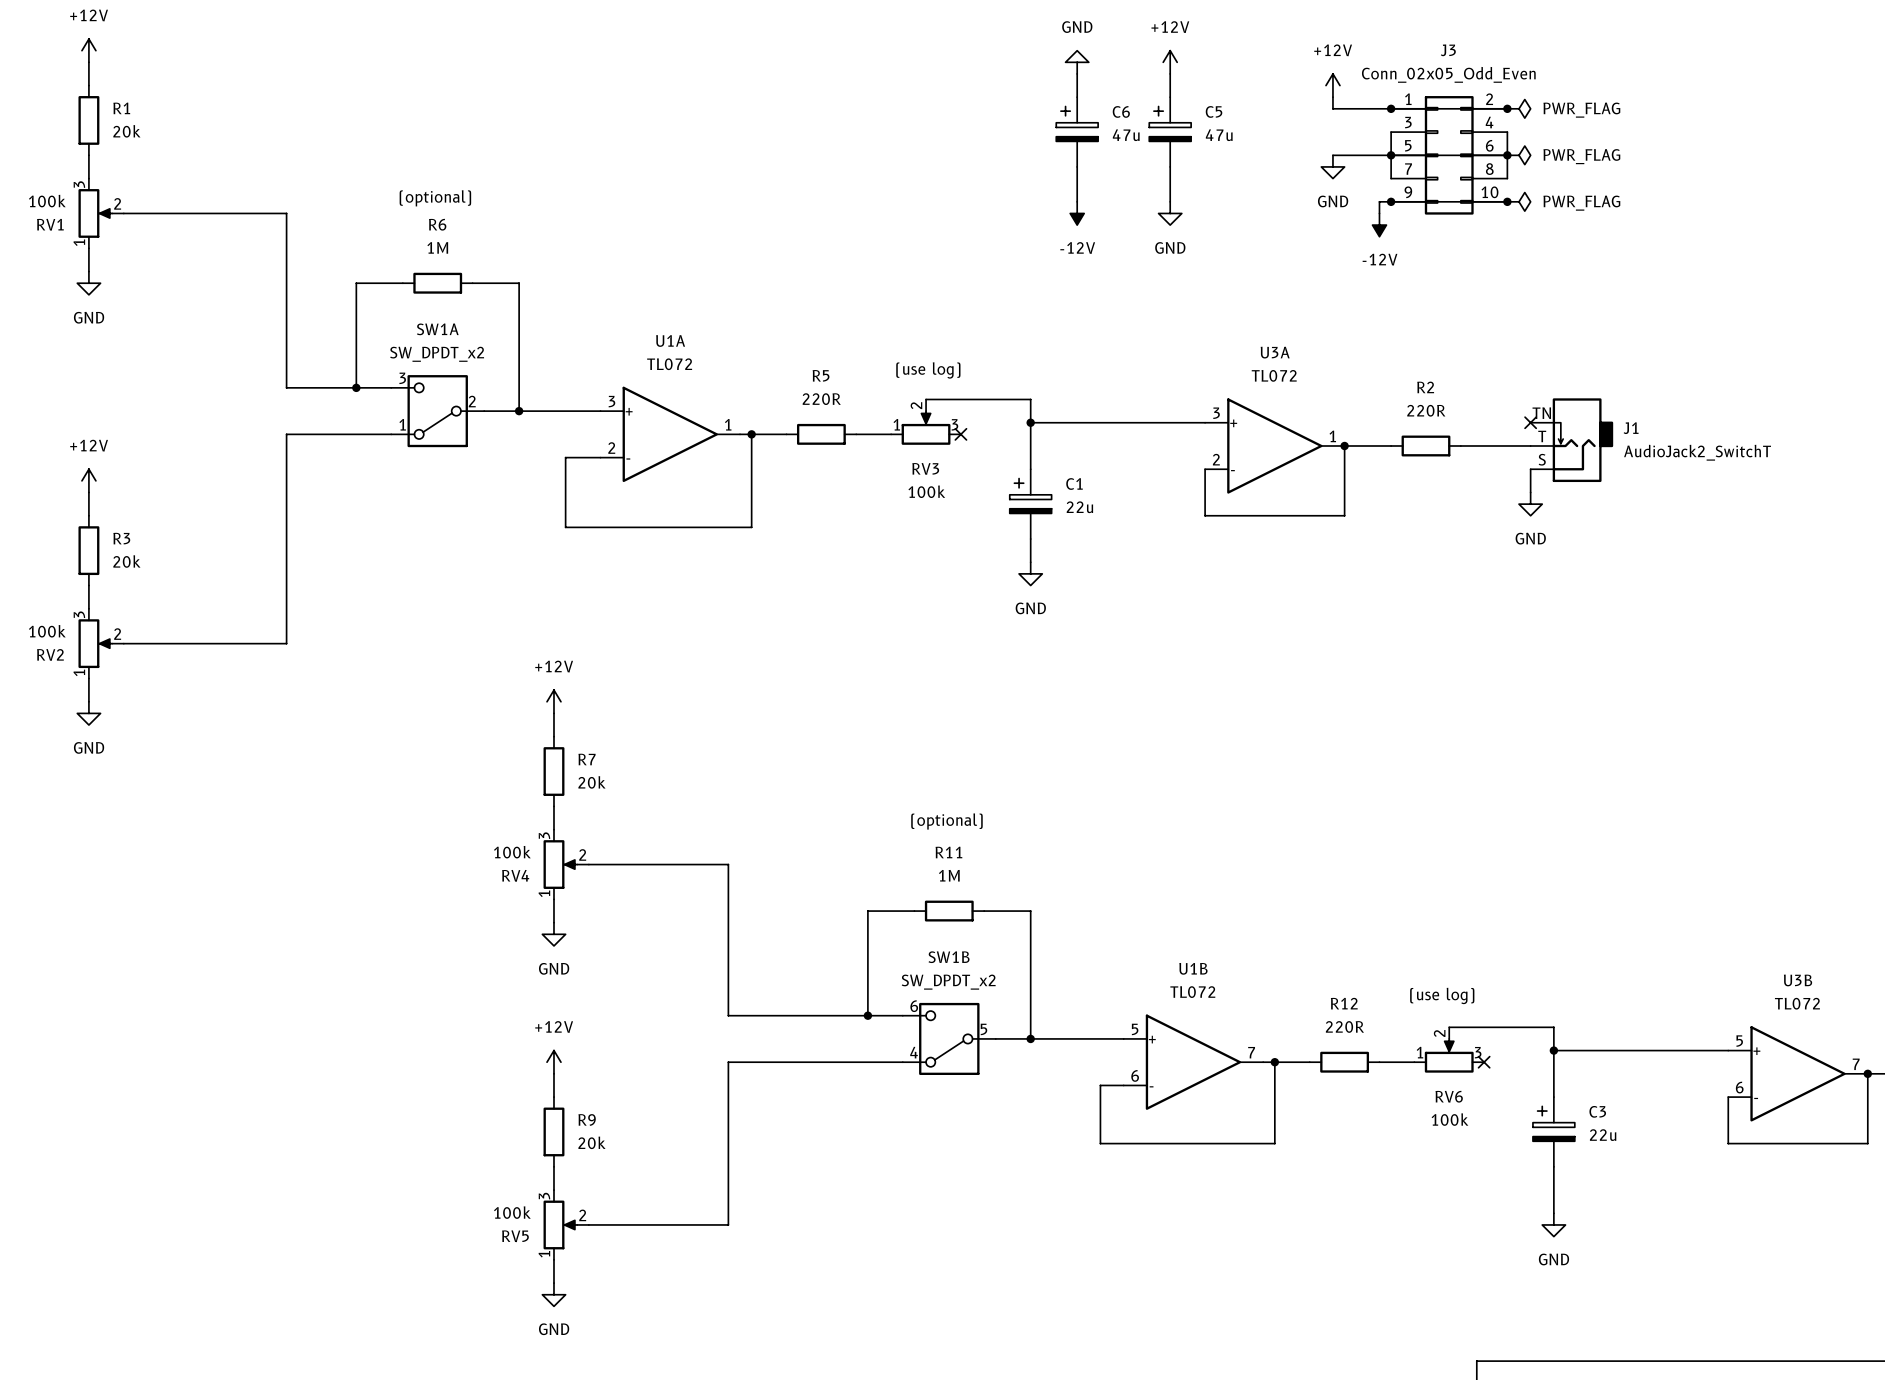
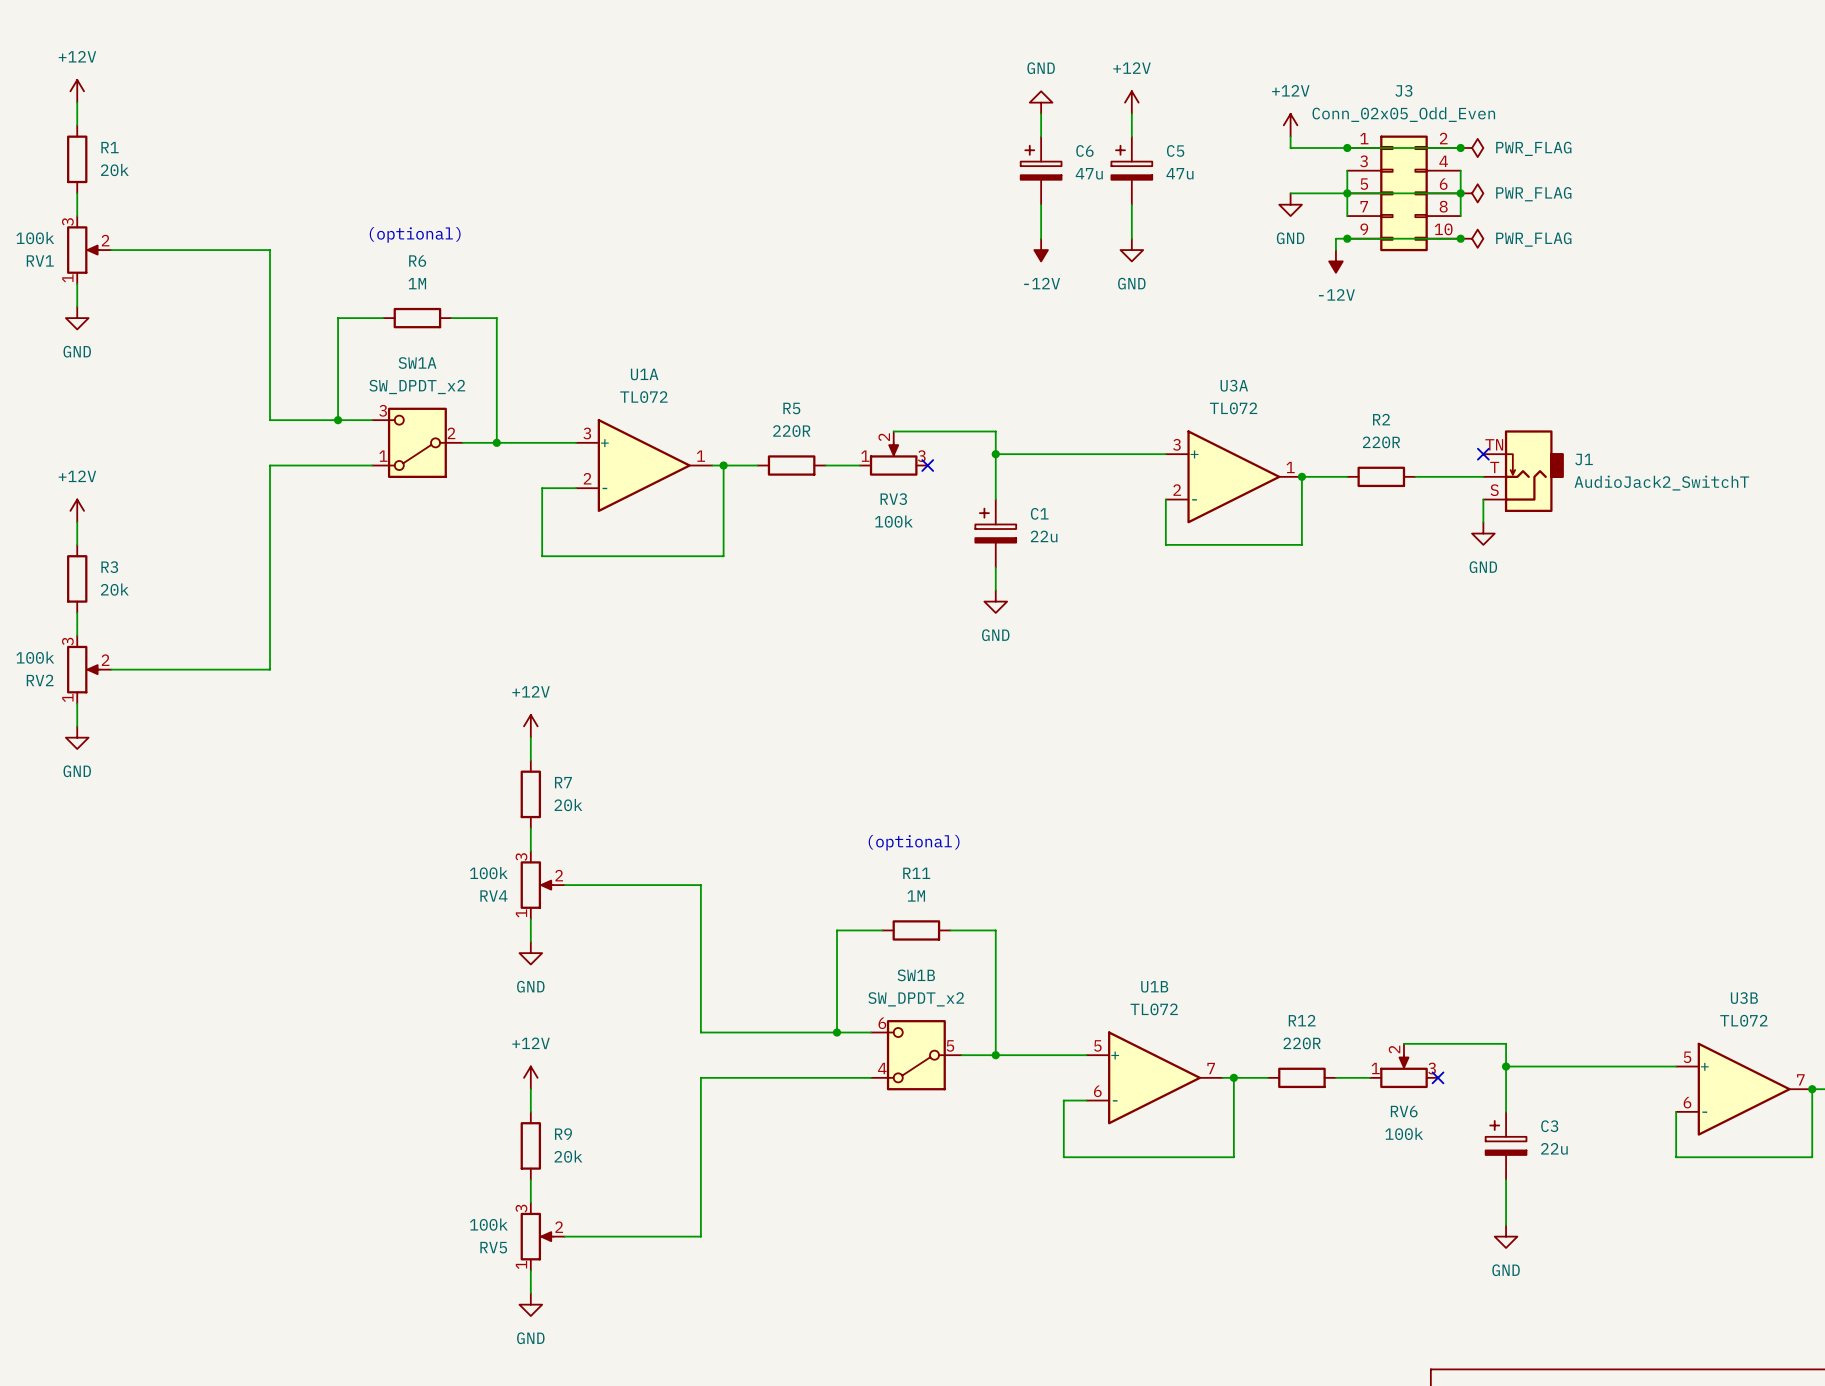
text: (use log) (928, 370) -> none
text: (use log) (1442, 995) -> none

